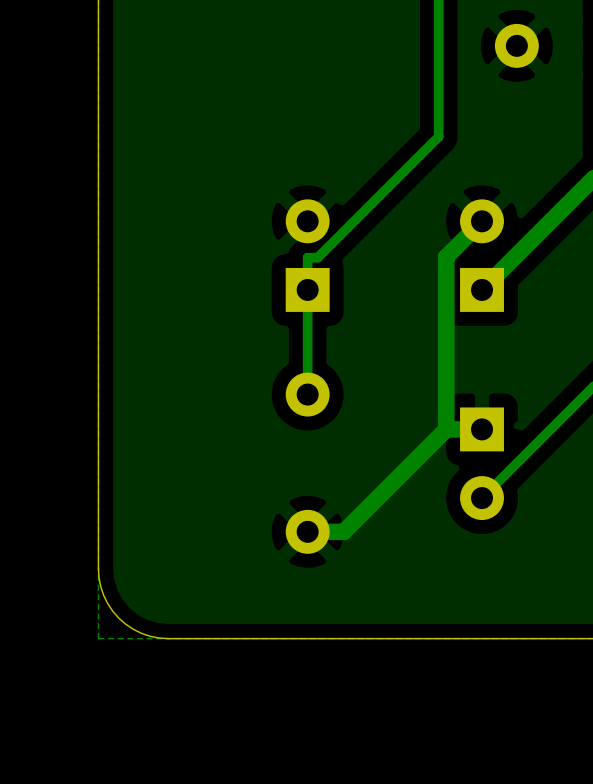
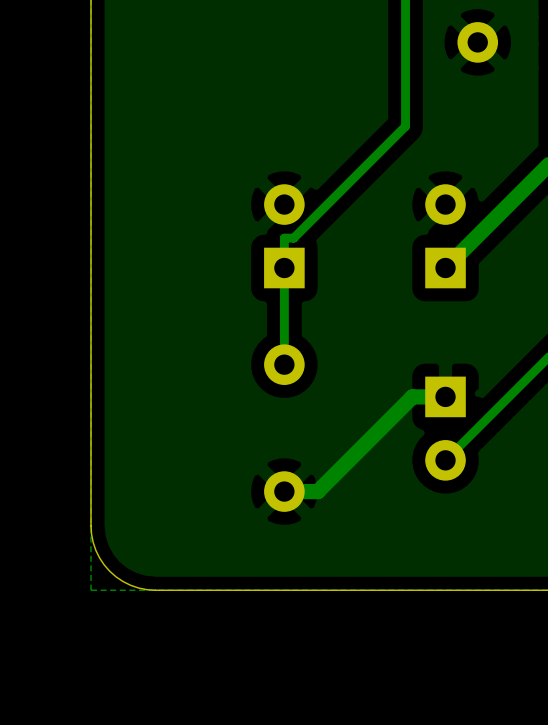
track: (482, 221) (446, 257) (446, 429) -> none

